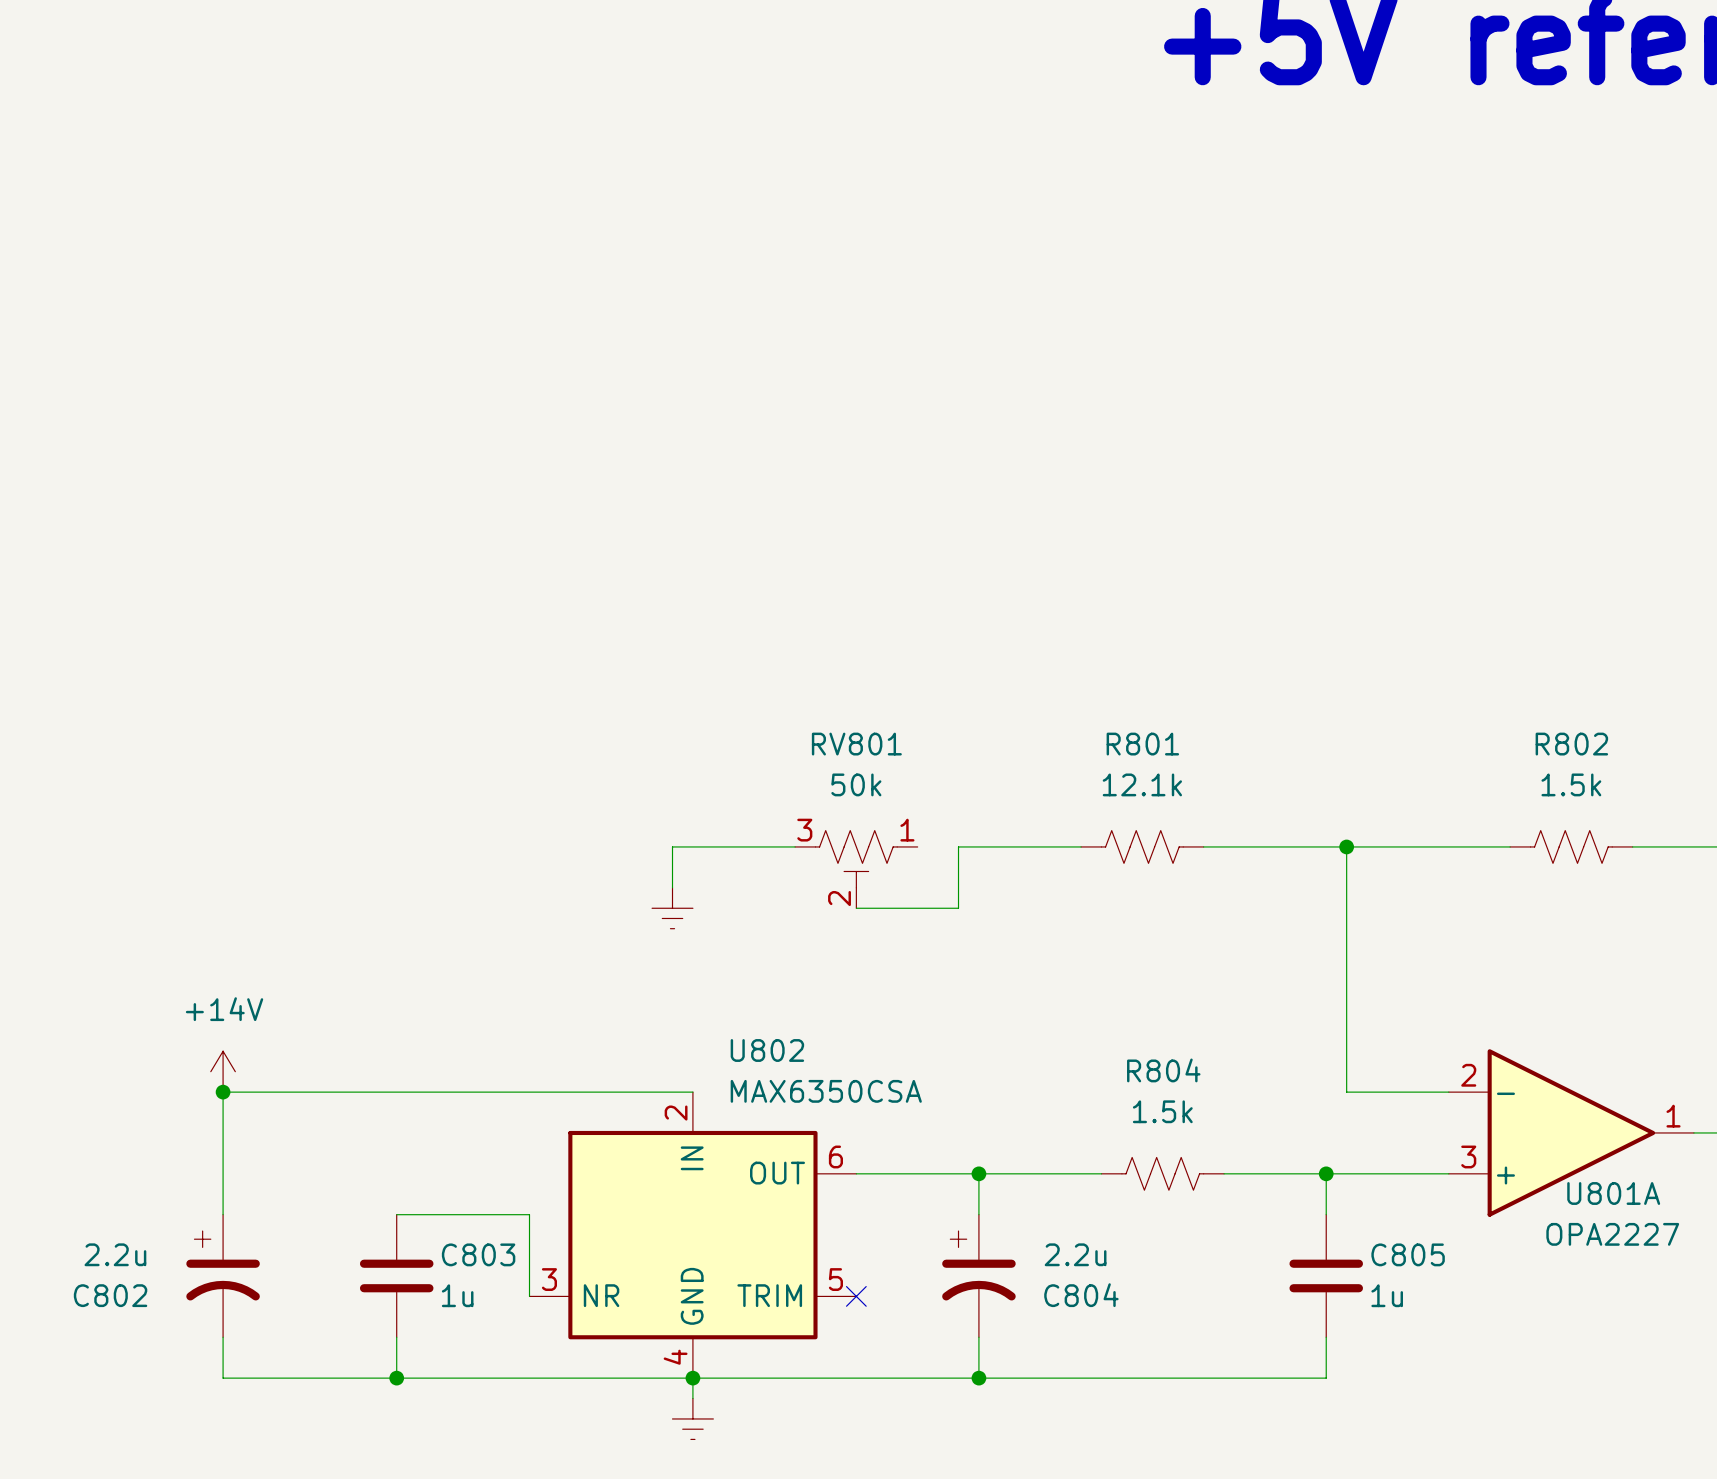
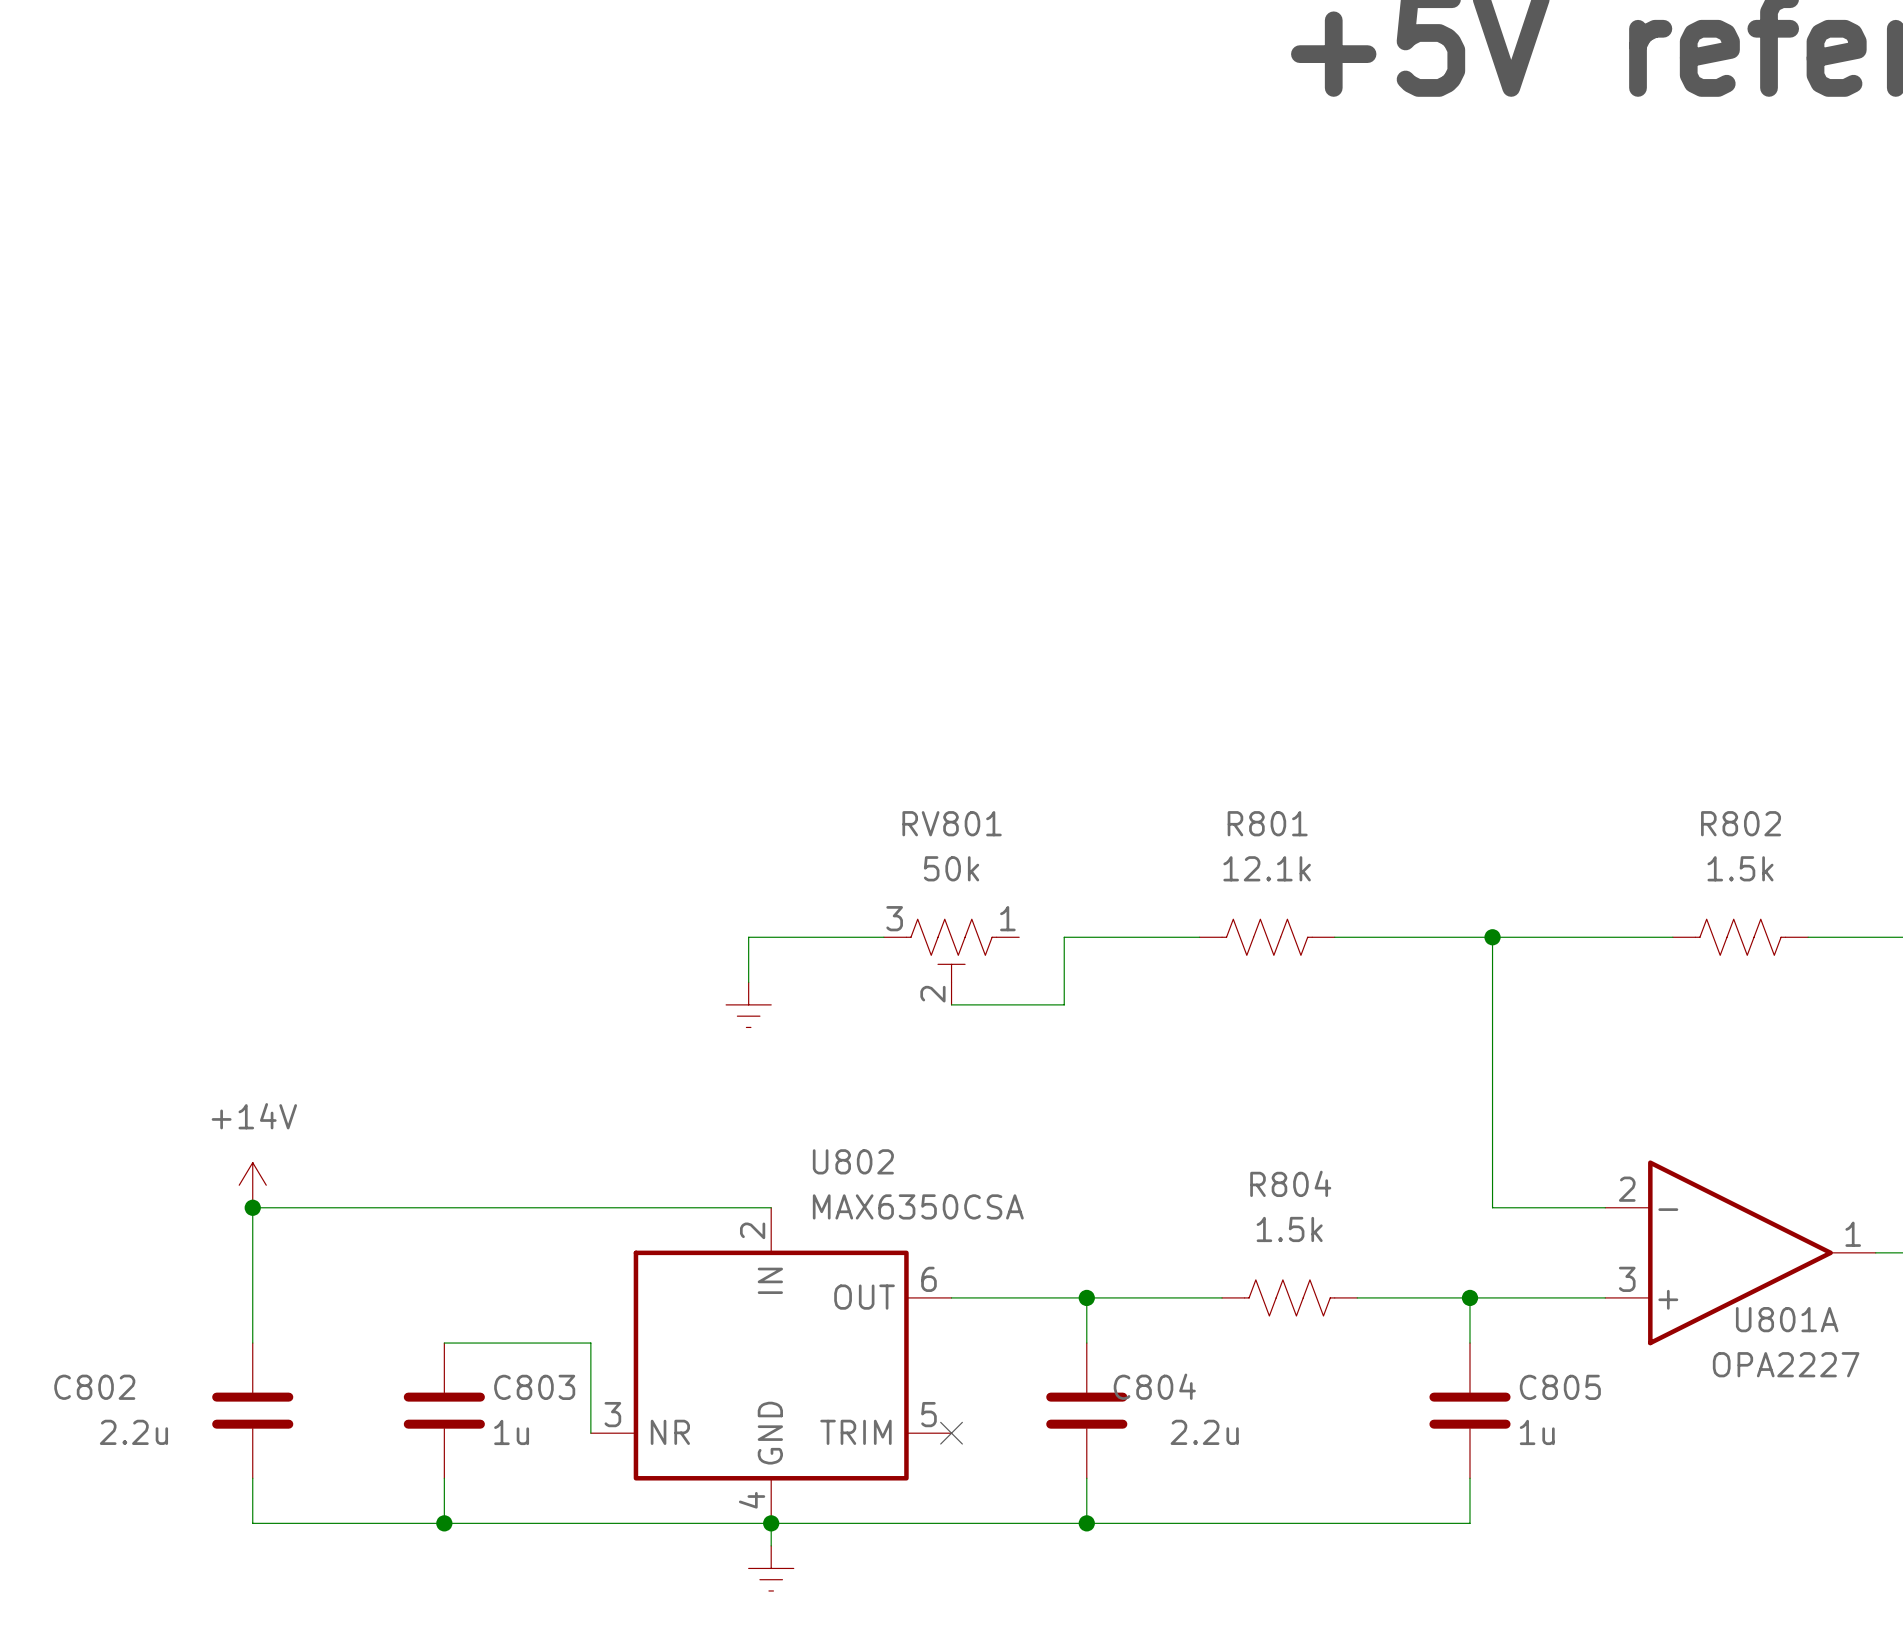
C802 symbol: [186, 1214, 260, 1338] -> [212, 1343, 294, 1479]
C804 symbol: [942, 1214, 1016, 1338] -> [1046, 1343, 1128, 1479]
C802 value position: 2.2u (115, 1254) -> 2.2u (133, 1432)
C804 value position: 2.2u (1075, 1254) -> 2.2u (1204, 1432)
C802 name position: C802 (110, 1295) -> C802 (94, 1387)
C804 name position: C804 (1081, 1295) -> C804 (1154, 1386)

